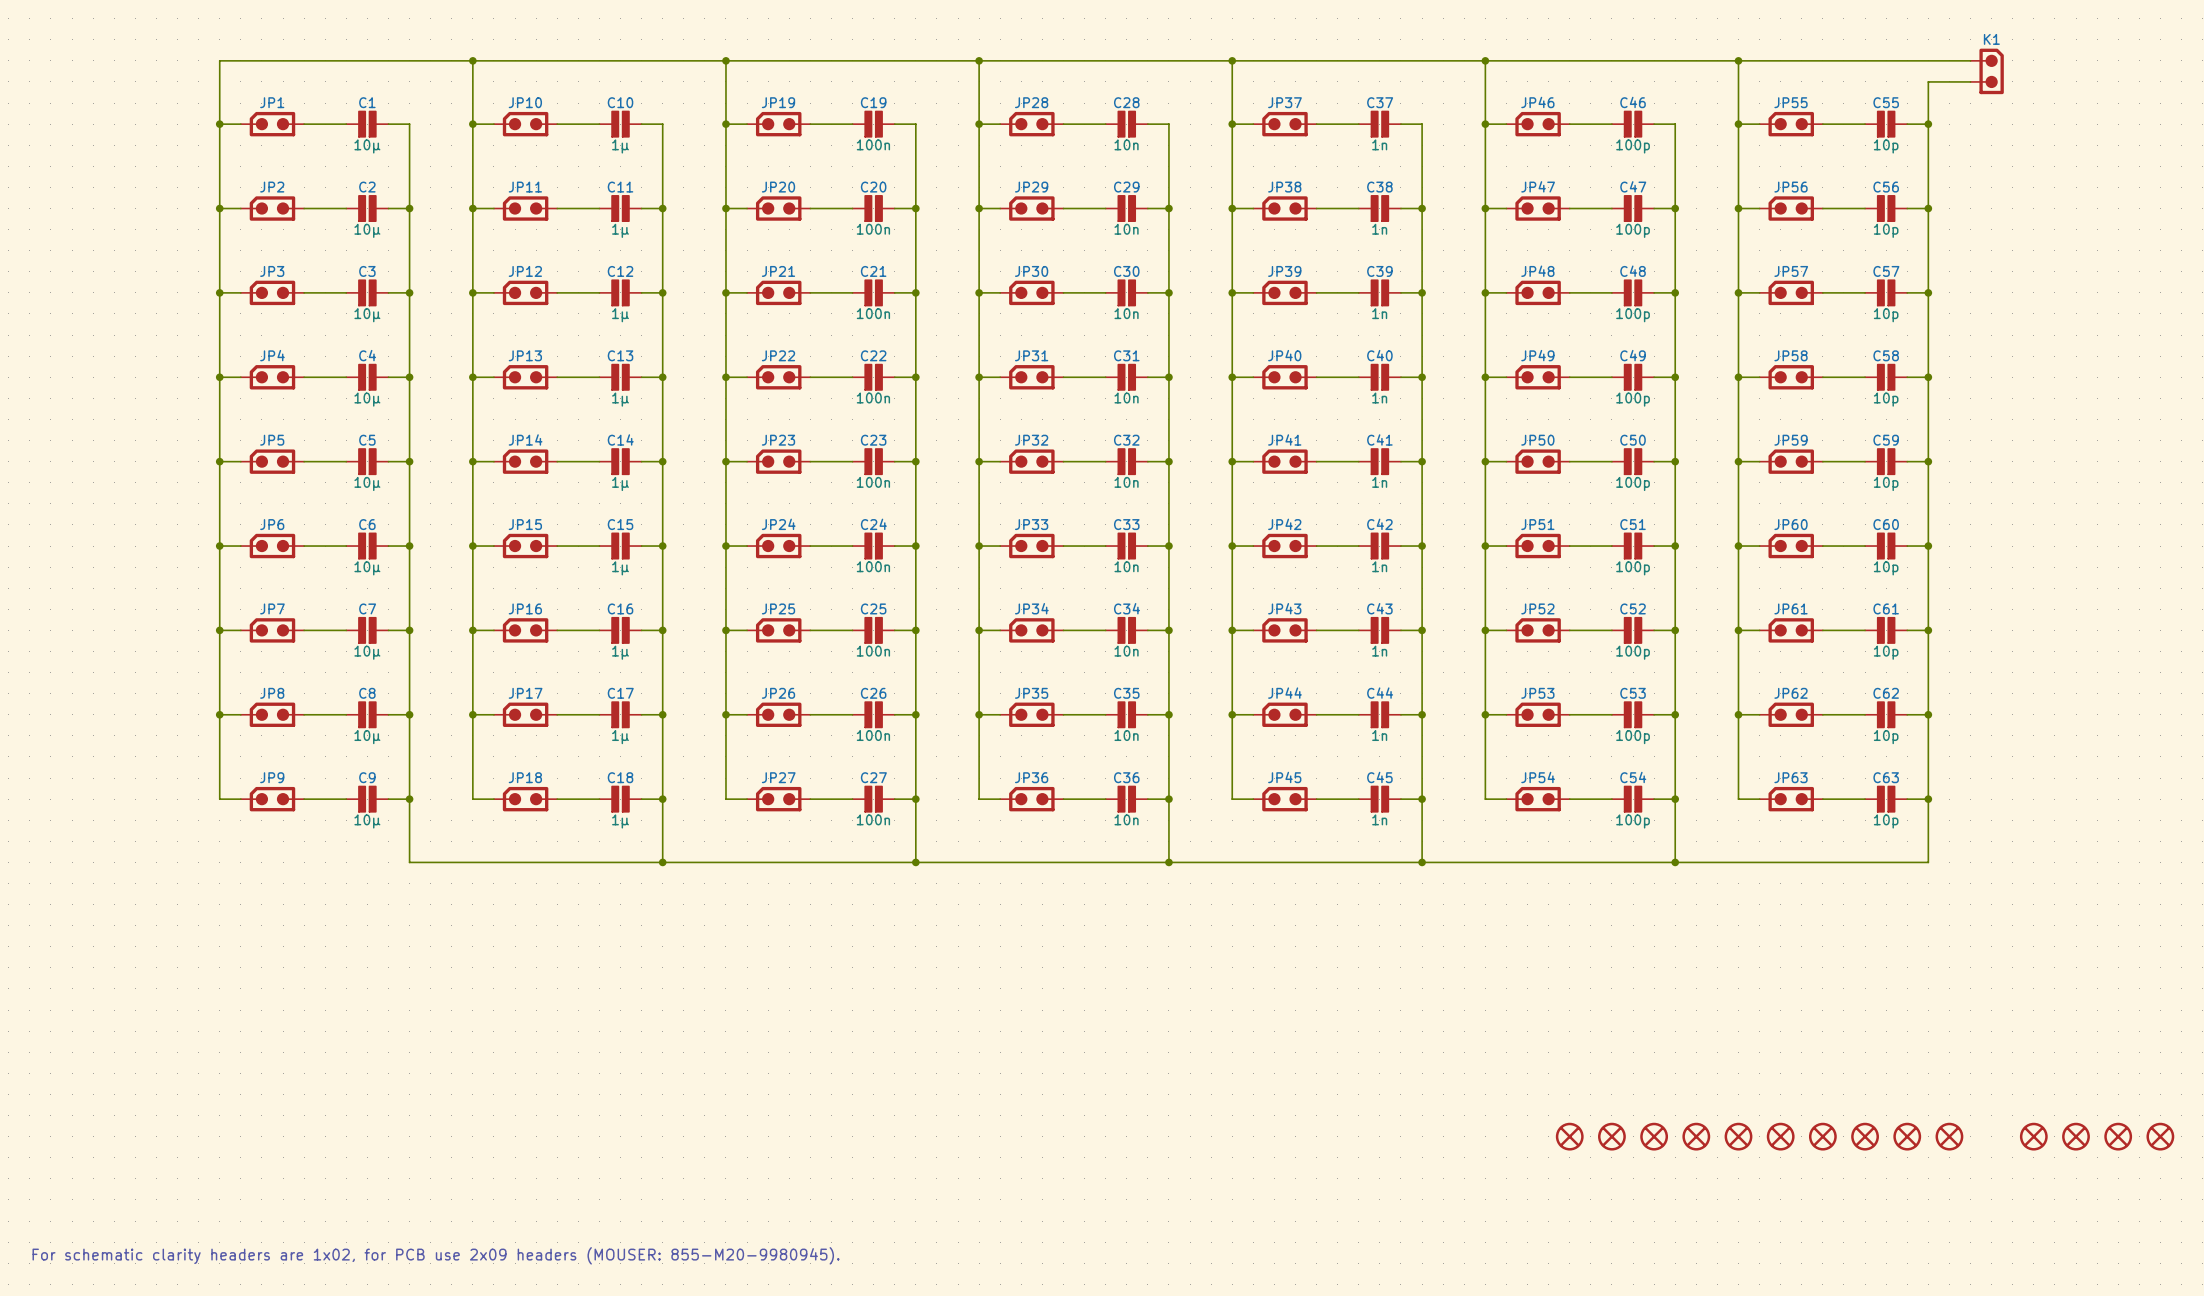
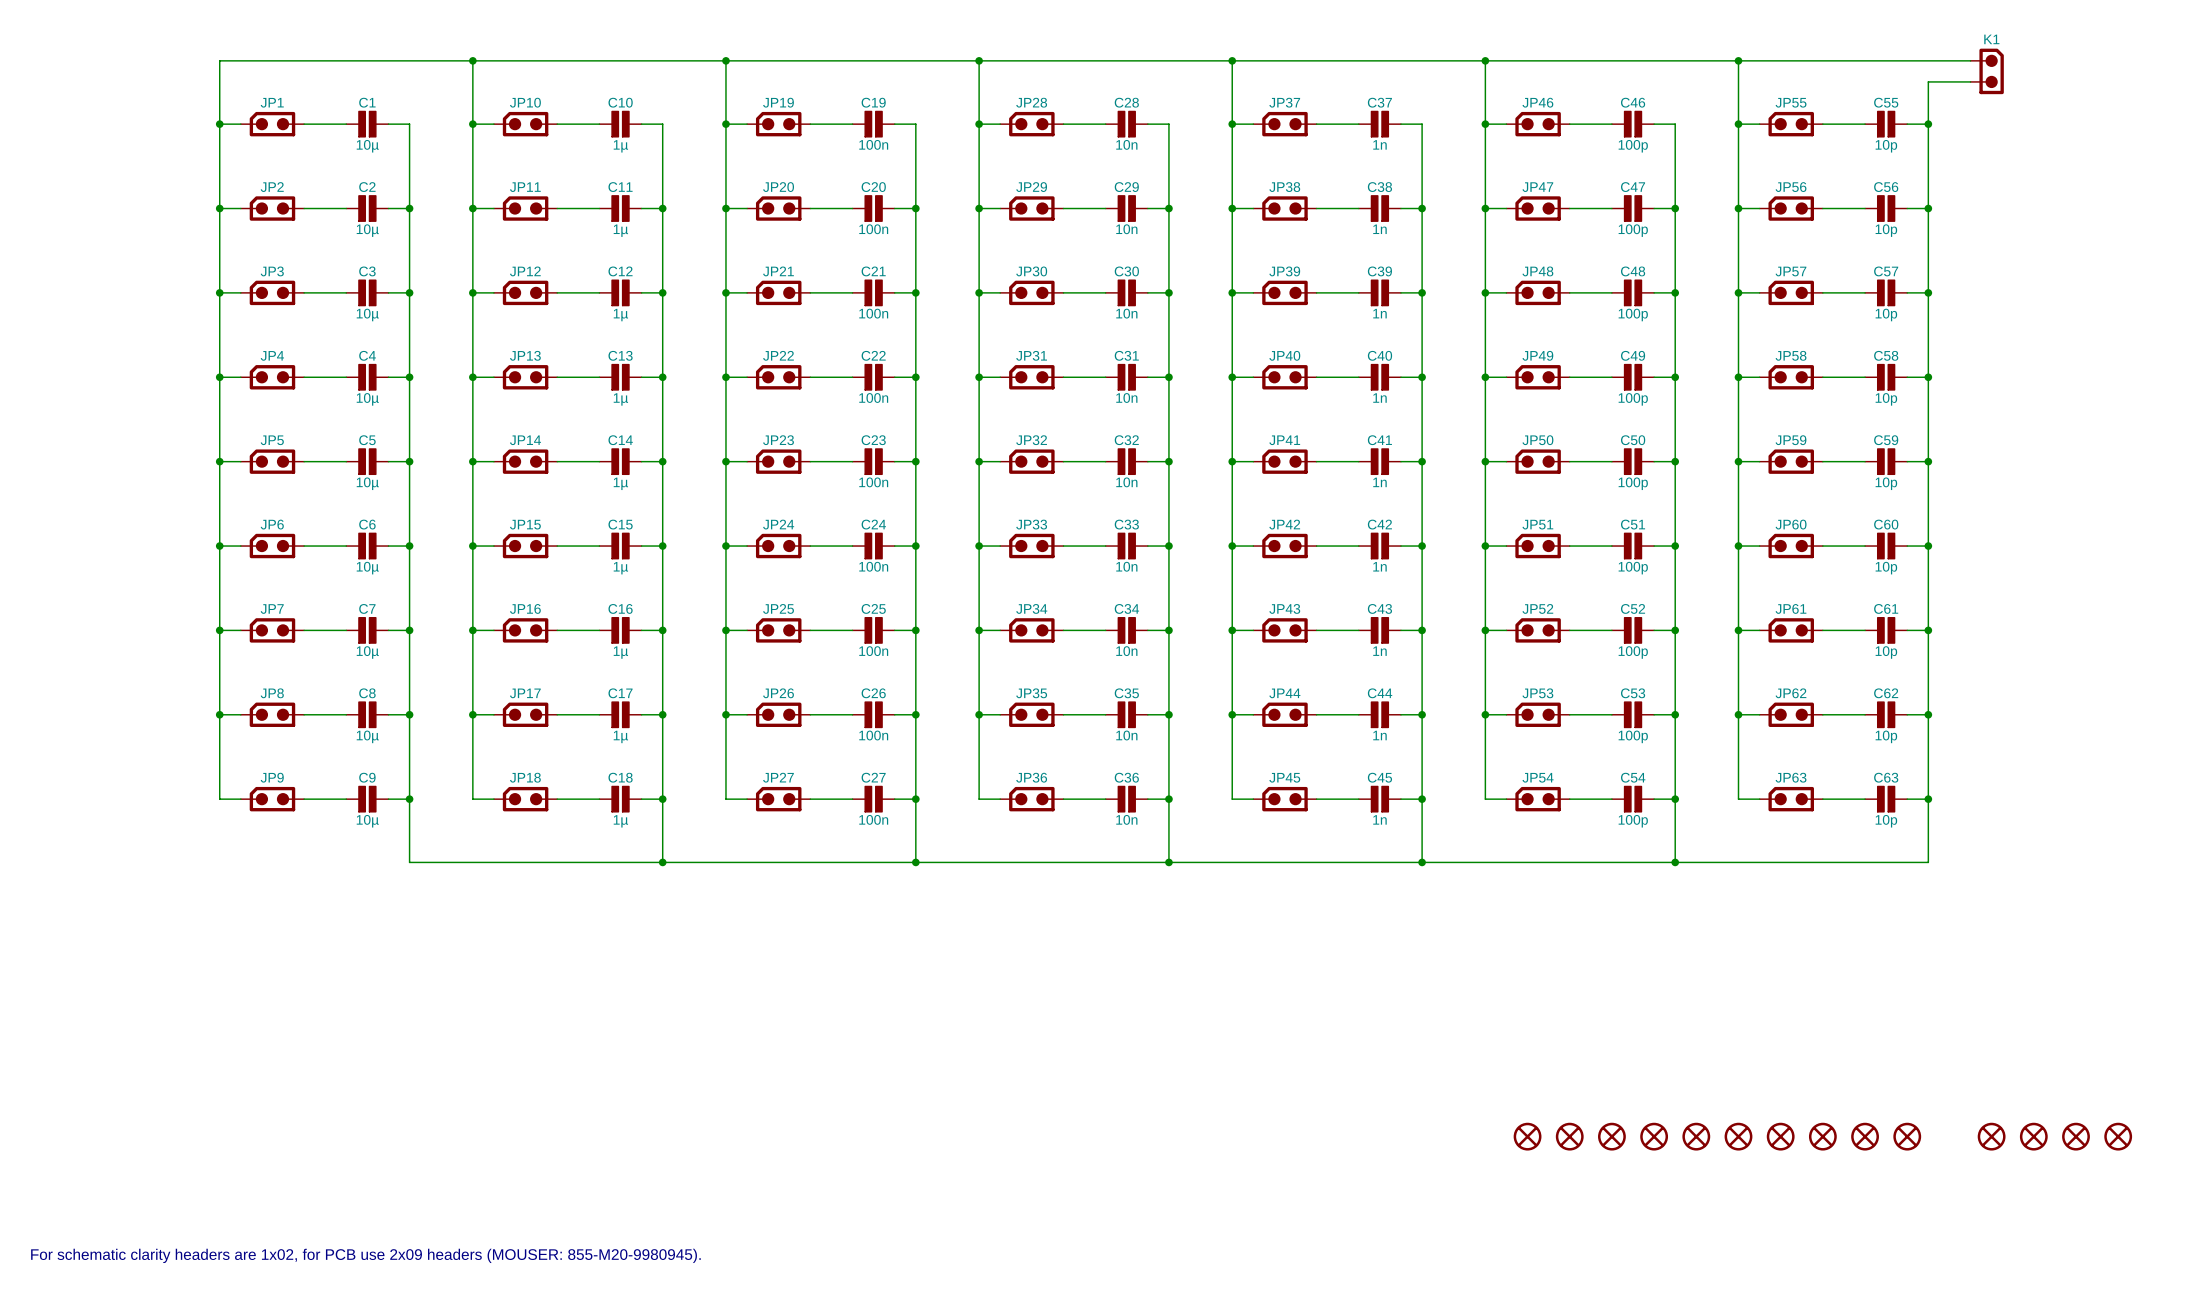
part: none -> (1527, 1136)
part position: (1949, 1136) -> (1991, 1136)
part: (2160, 1136) -> none

